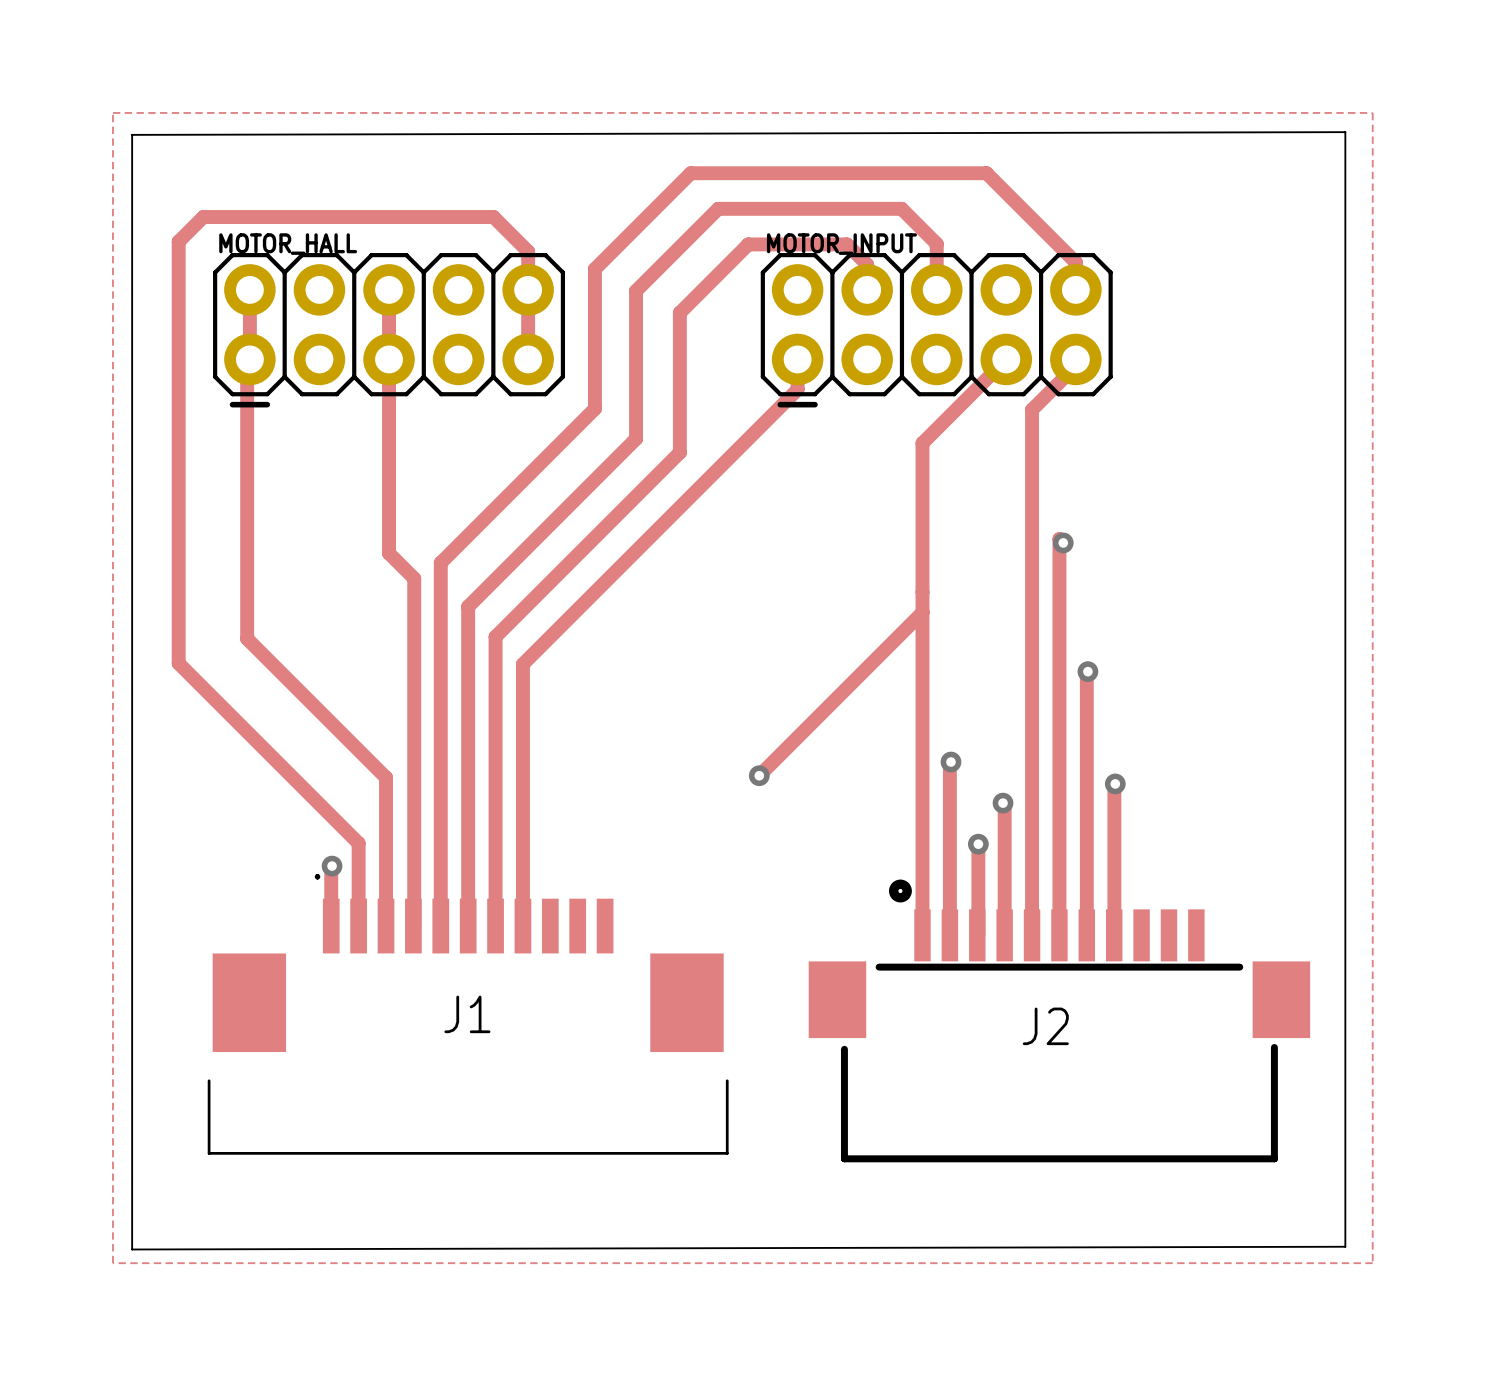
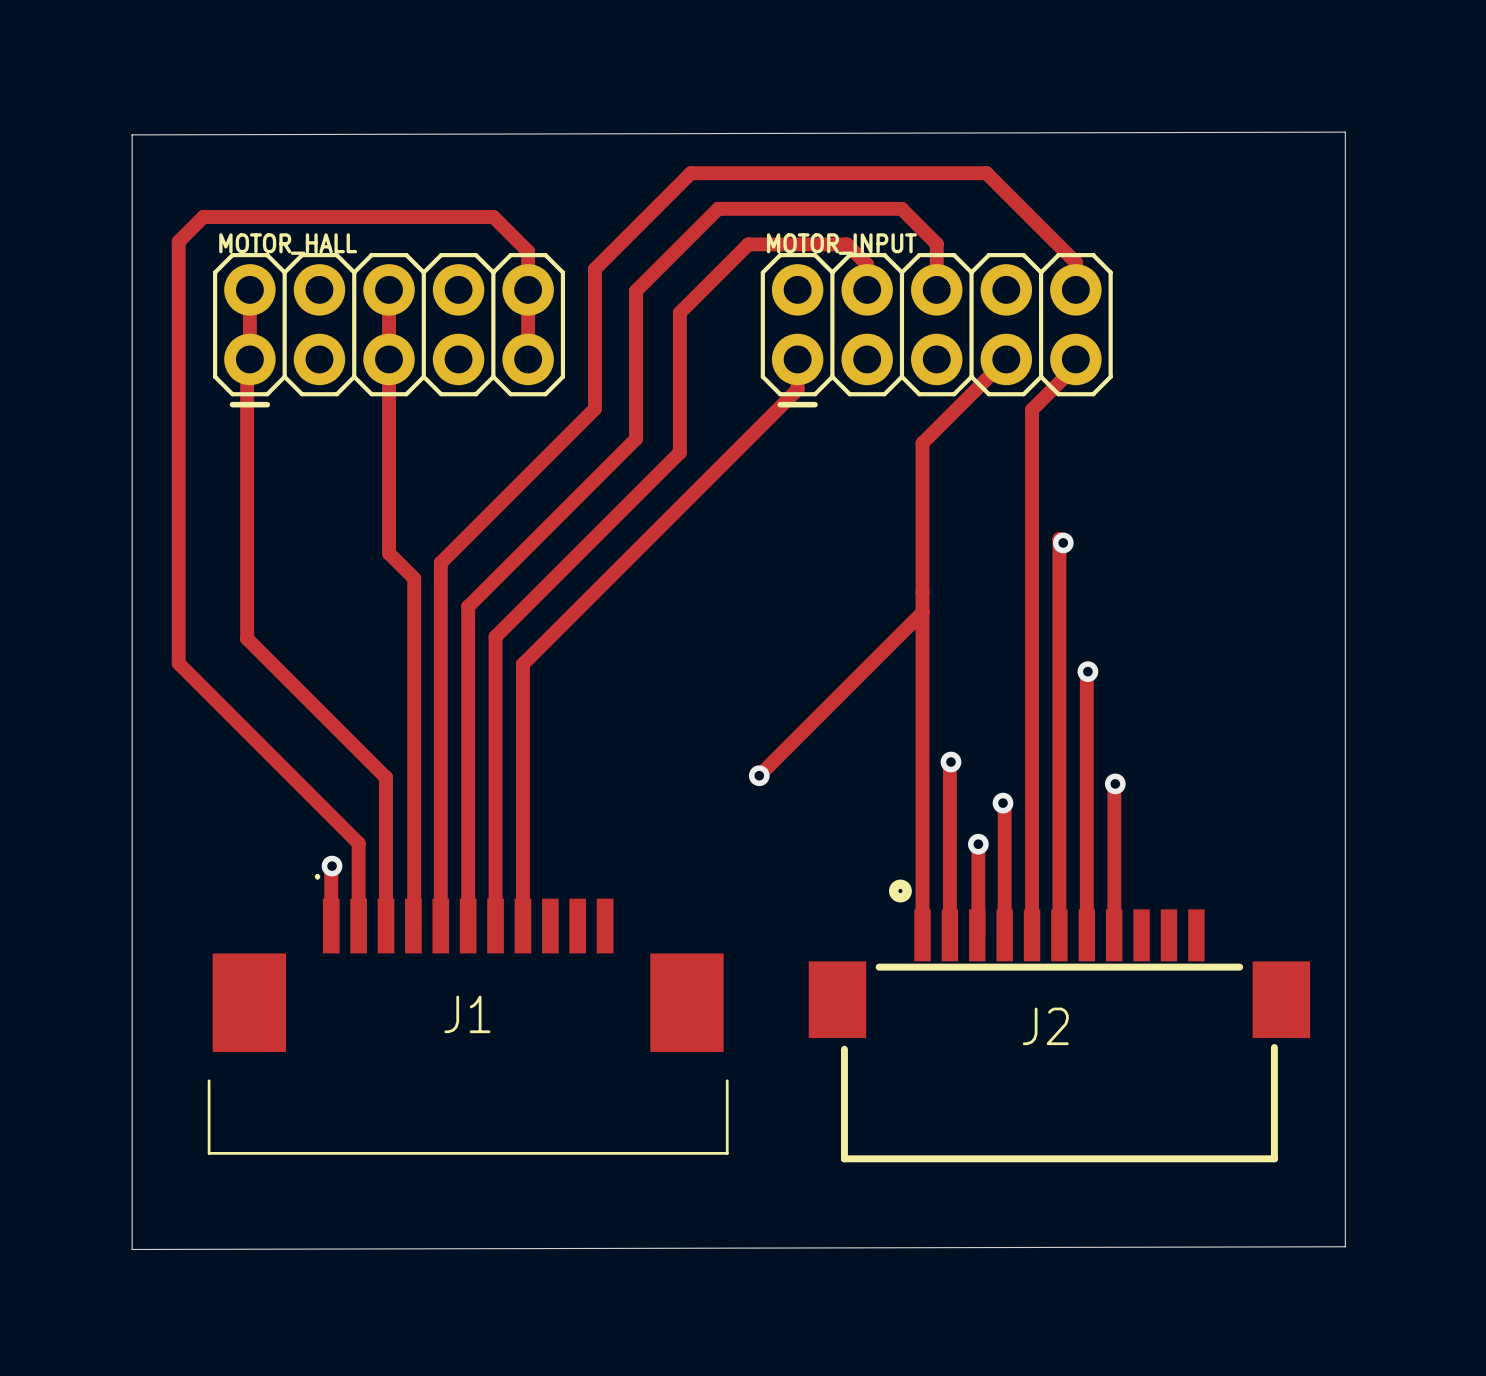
zone outline: (112, 112) (1372, 112) (1372, 1263) (112, 1263) (112, 112) -> none

